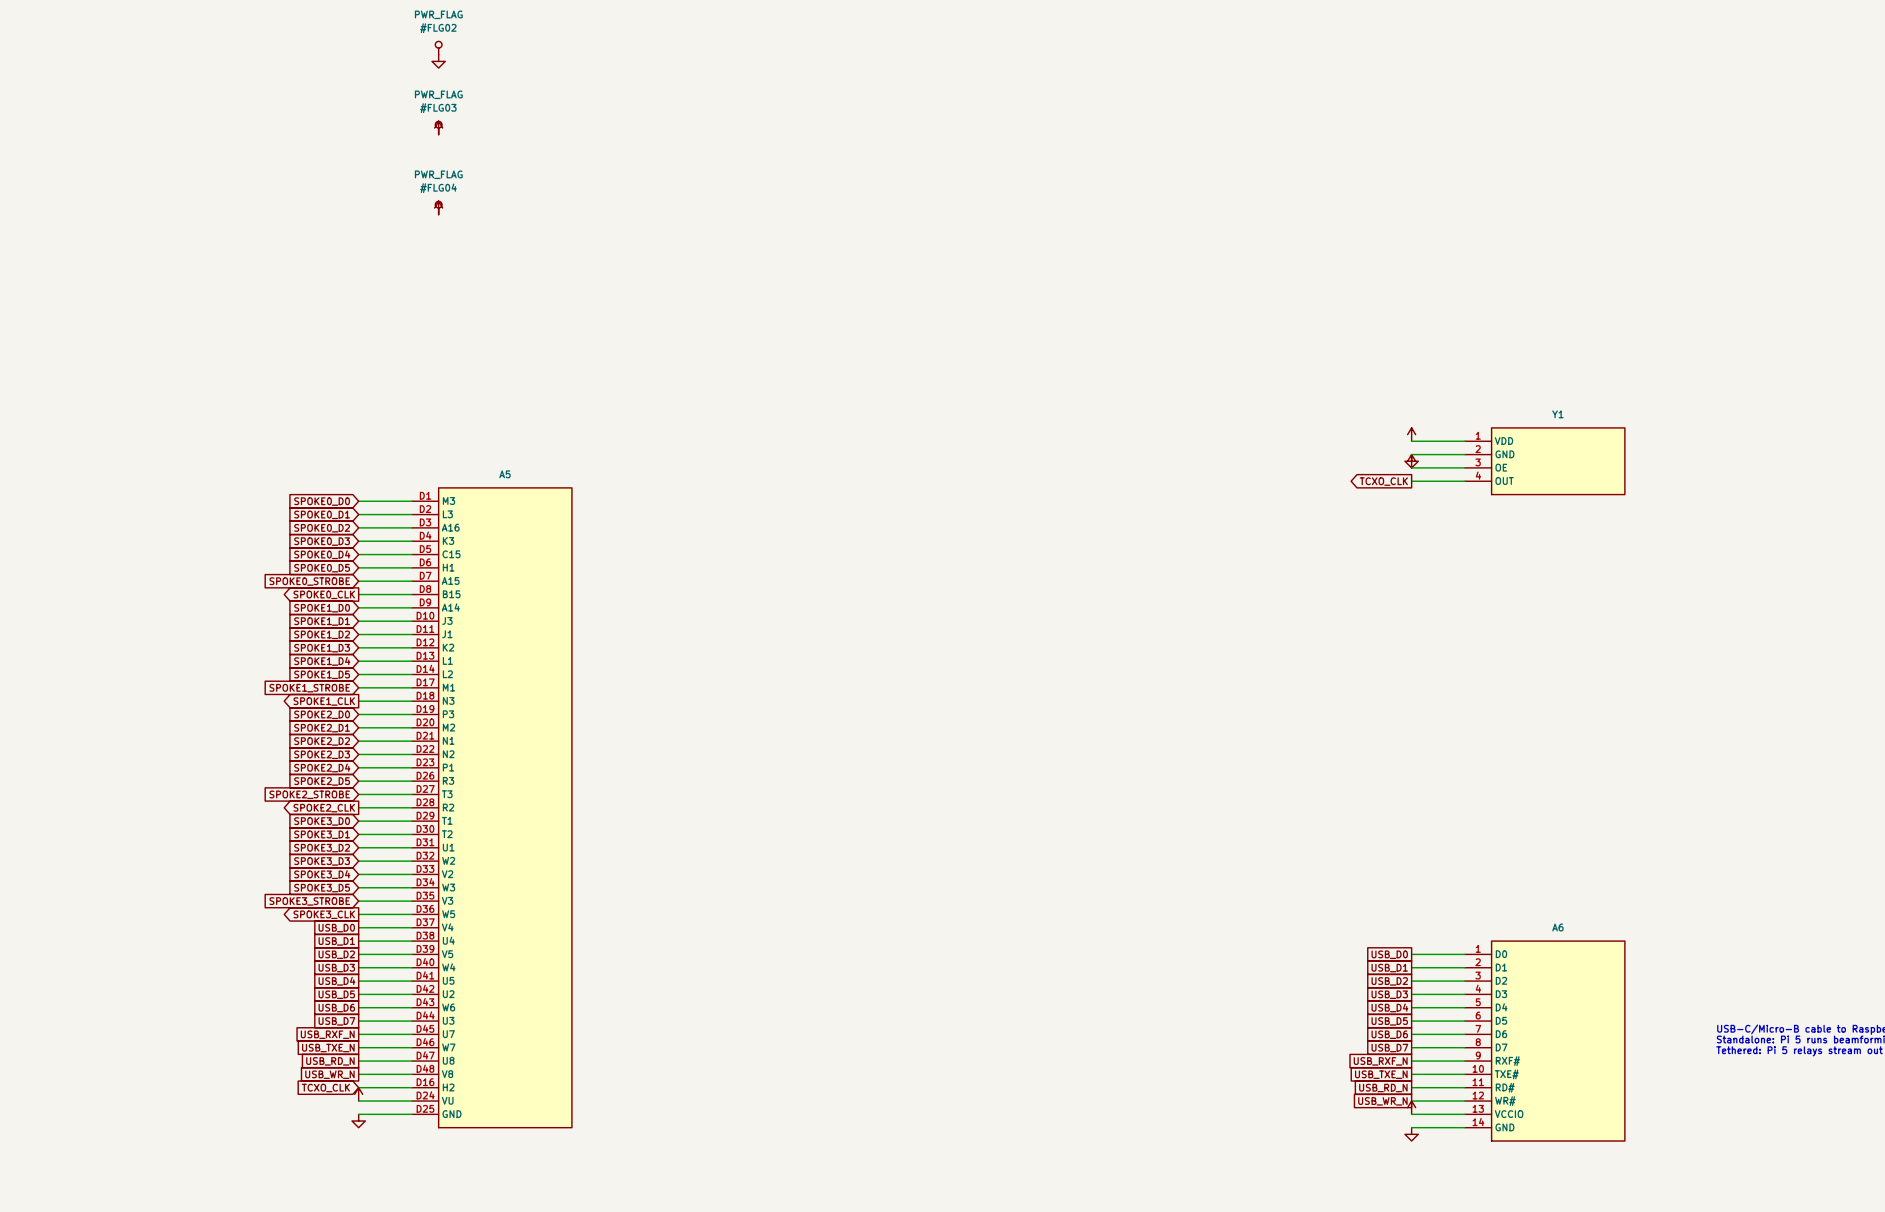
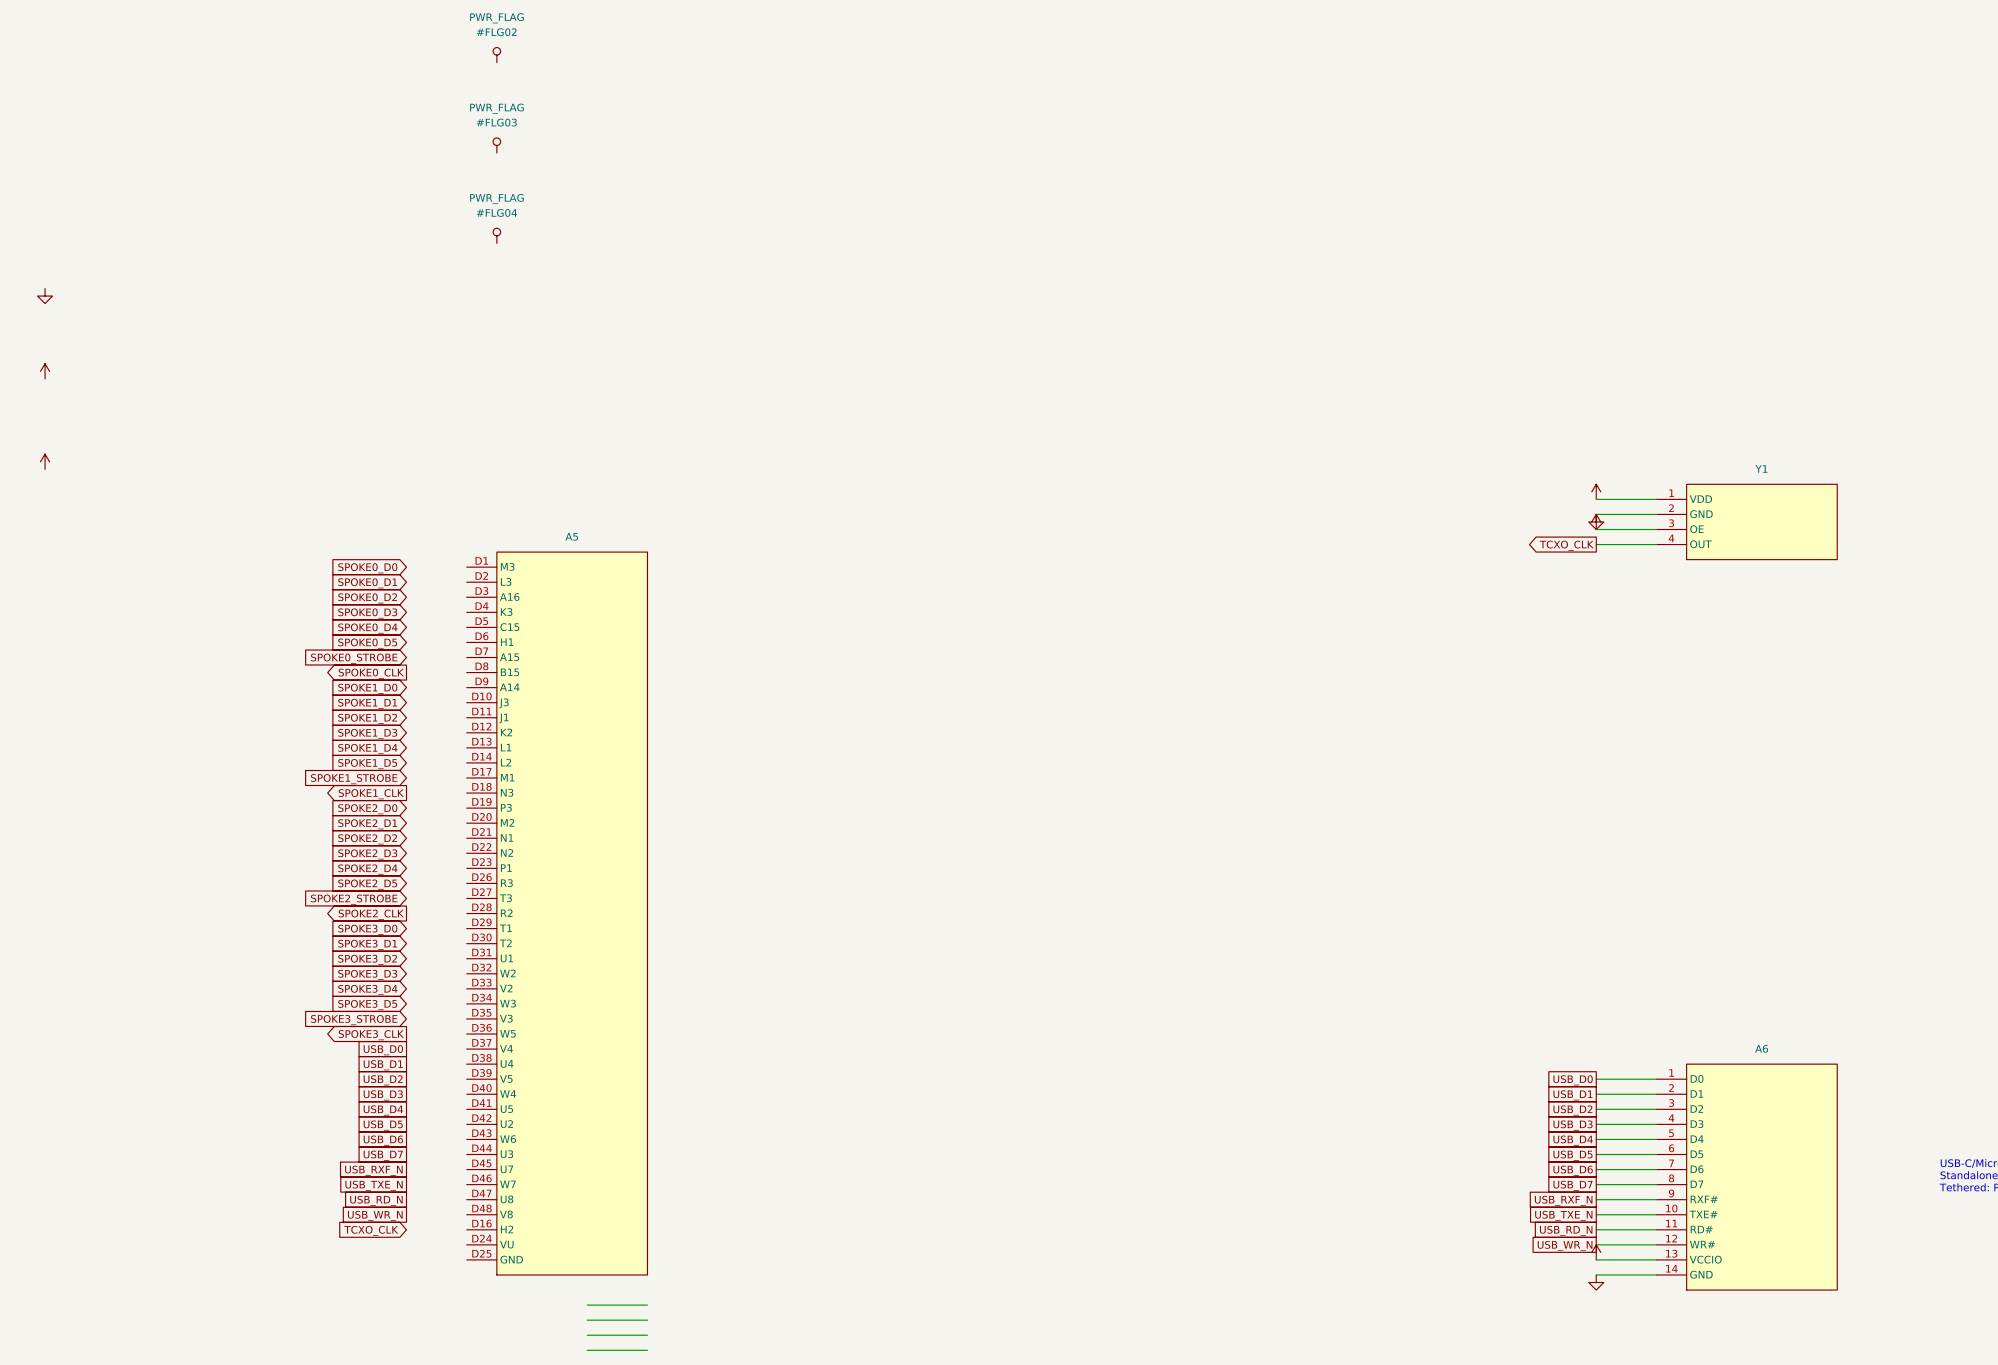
power symbol: (438, 61) -> none
power symbol: (438, 128) -> none
power symbol: (438, 208) -> none
power symbol: none -> (45, 296)
power symbol: none -> (45, 371)
power symbol: none -> (45, 461)
wire: (358, 501) (411, 501) -> none
wire: (358, 514) (411, 514) -> none
wire: (358, 527) (411, 527) -> none
wire: (358, 541) (411, 541) -> none
wire: (358, 554) (411, 554) -> none
wire: (358, 567) (411, 567) -> none
wire: (358, 581) (411, 581) -> none
wire: (358, 594) (411, 594) -> none
wire: (358, 607) (411, 607) -> none
wire: (358, 621) (411, 621) -> none
wire: (358, 634) (411, 634) -> none
wire: (358, 647) (411, 647) -> none
wire: (358, 661) (411, 661) -> none
wire: (358, 674) (411, 674) -> none
wire: (358, 687) (411, 687) -> none
wire: (358, 701) (411, 701) -> none
wire: (358, 714) (411, 714) -> none
wire: (358, 727) (411, 727) -> none
wire: (358, 741) (411, 741) -> none
wire: (358, 754) (411, 754) -> none
wire: (358, 767) (411, 767) -> none
wire: (358, 781) (411, 781) -> none
wire: (358, 794) (411, 794) -> none
wire: (358, 807) (411, 807) -> none
wire: (358, 821) (411, 821) -> none
wire: (358, 834) (411, 834) -> none
wire: (358, 847) (411, 847) -> none
wire: (358, 861) (411, 861) -> none
wire: (358, 874) (411, 874) -> none
wire: (358, 887) (411, 887) -> none
wire: (358, 901) (411, 901) -> none
wire: (358, 914) (411, 914) -> none
wire: (358, 927) (411, 927) -> none
wire: (358, 941) (411, 941) -> none
wire: (358, 954) (411, 954) -> none
wire: (358, 967) (411, 967) -> none
wire: (358, 981) (411, 981) -> none
wire: (358, 994) (411, 994) -> none
wire: (358, 1007) (411, 1007) -> none
wire: (358, 1021) (411, 1021) -> none
wire: (358, 1034) (411, 1034) -> none
wire: (358, 1047) (411, 1047) -> none
wire: (358, 1061) (411, 1061) -> none
wire: (358, 1074) (411, 1074) -> none
wire: (358, 1087) (411, 1087) -> none
power symbol: (358, 1094) -> none
wire: (358, 1101) (411, 1101) -> none
wire: (358, 1114) (411, 1114) -> none
power symbol: (358, 1121) -> none
wire: none -> (587, 1305) (647, 1305)
wire: none -> (587, 1320) (647, 1320)
wire: none -> (587, 1335) (647, 1335)
wire: none -> (587, 1350) (647, 1350)

